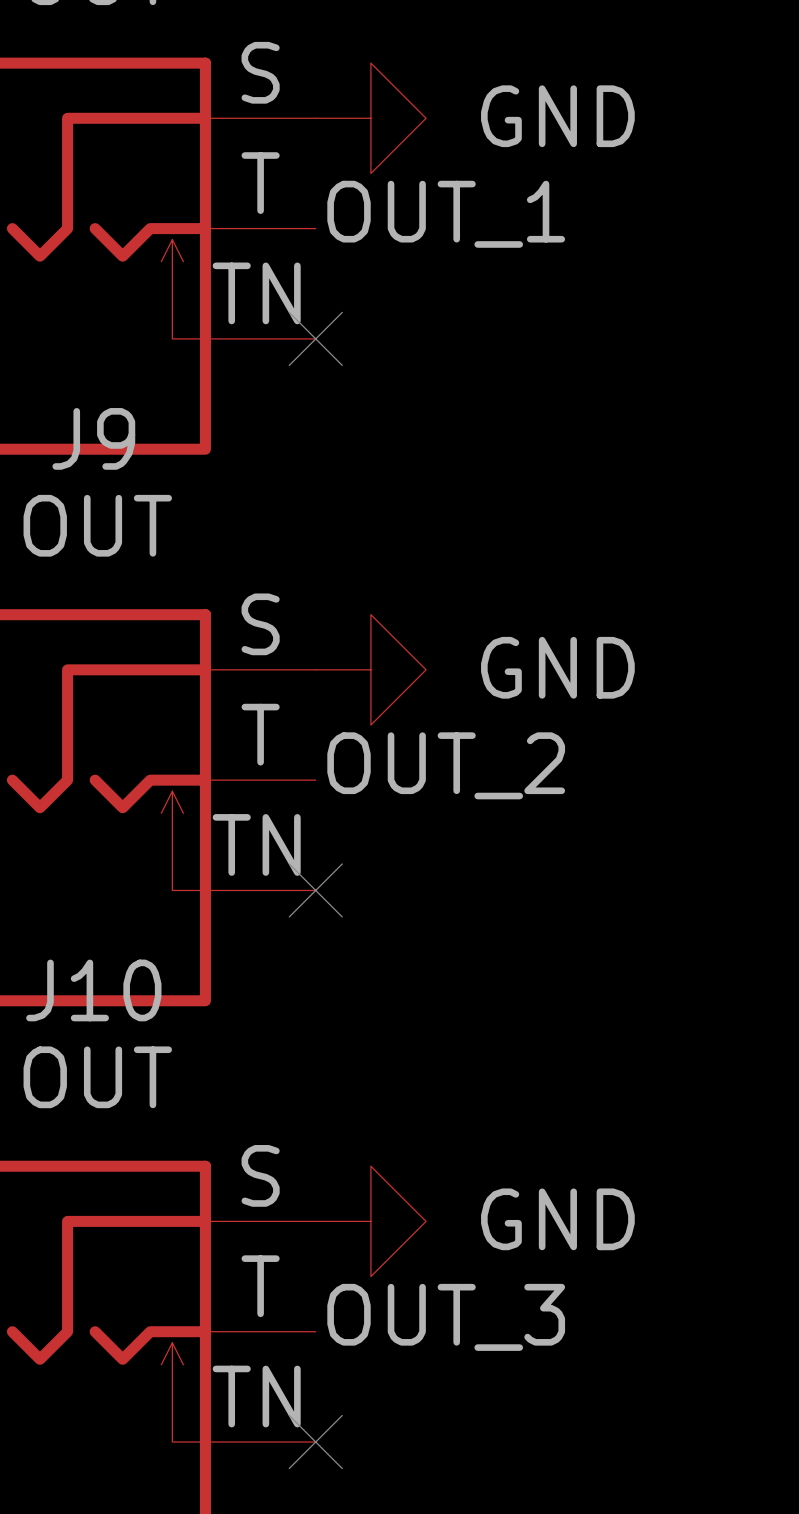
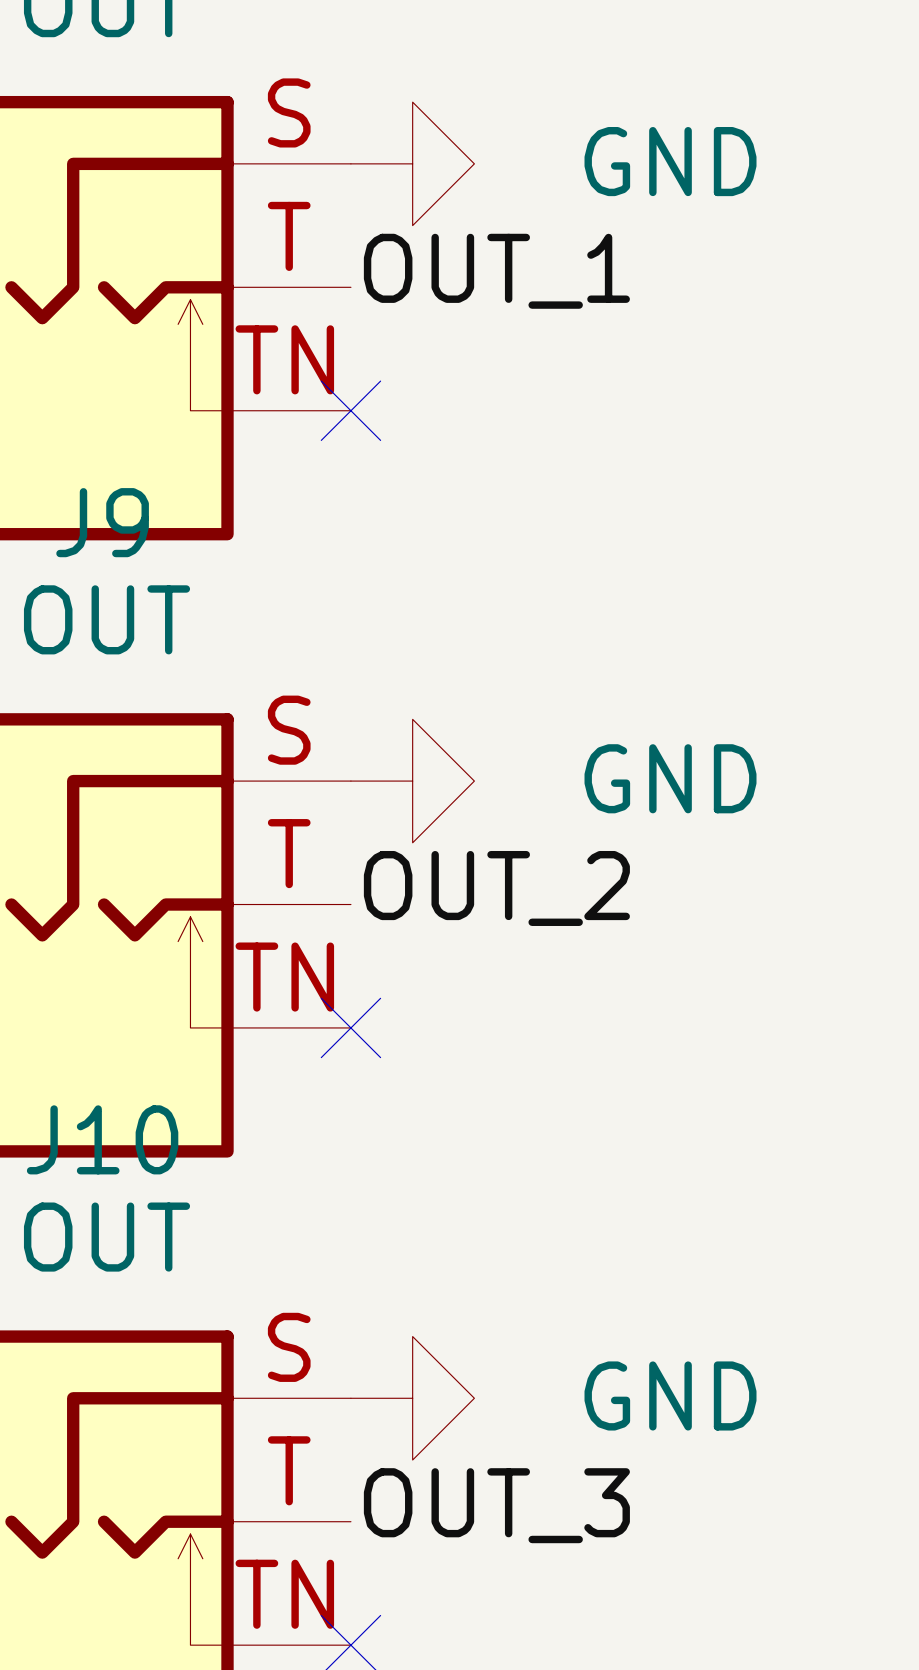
power symbol text position: GND (557, 116) -> GND (670, 161)
power symbol text position: GND (557, 667) -> GND (670, 778)
power symbol text position: GND (557, 1219) -> GND (670, 1395)

